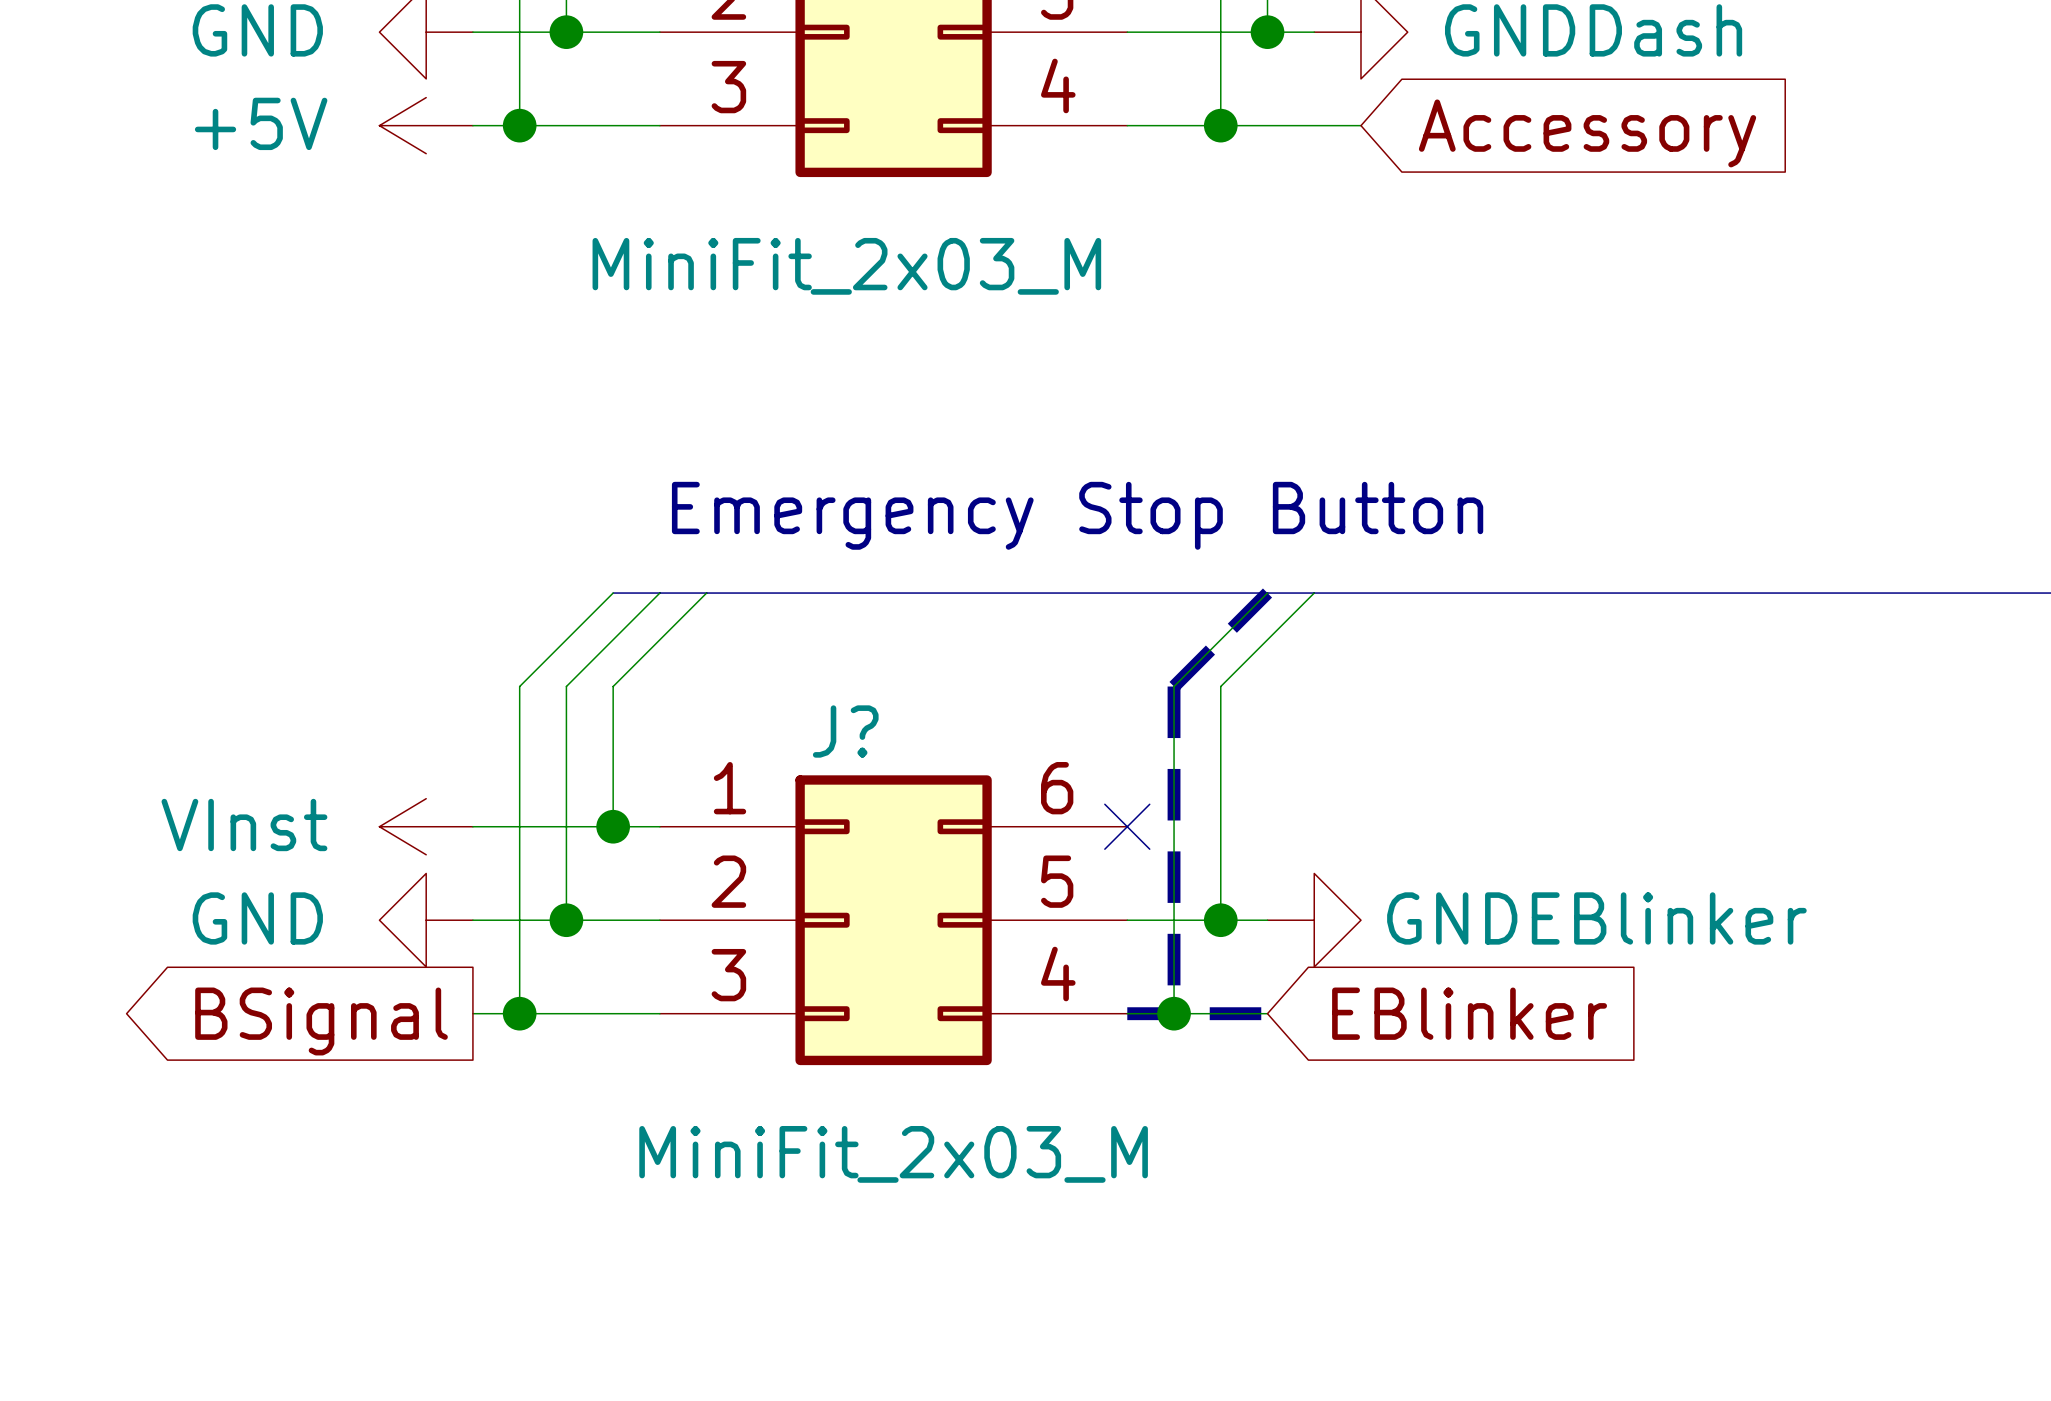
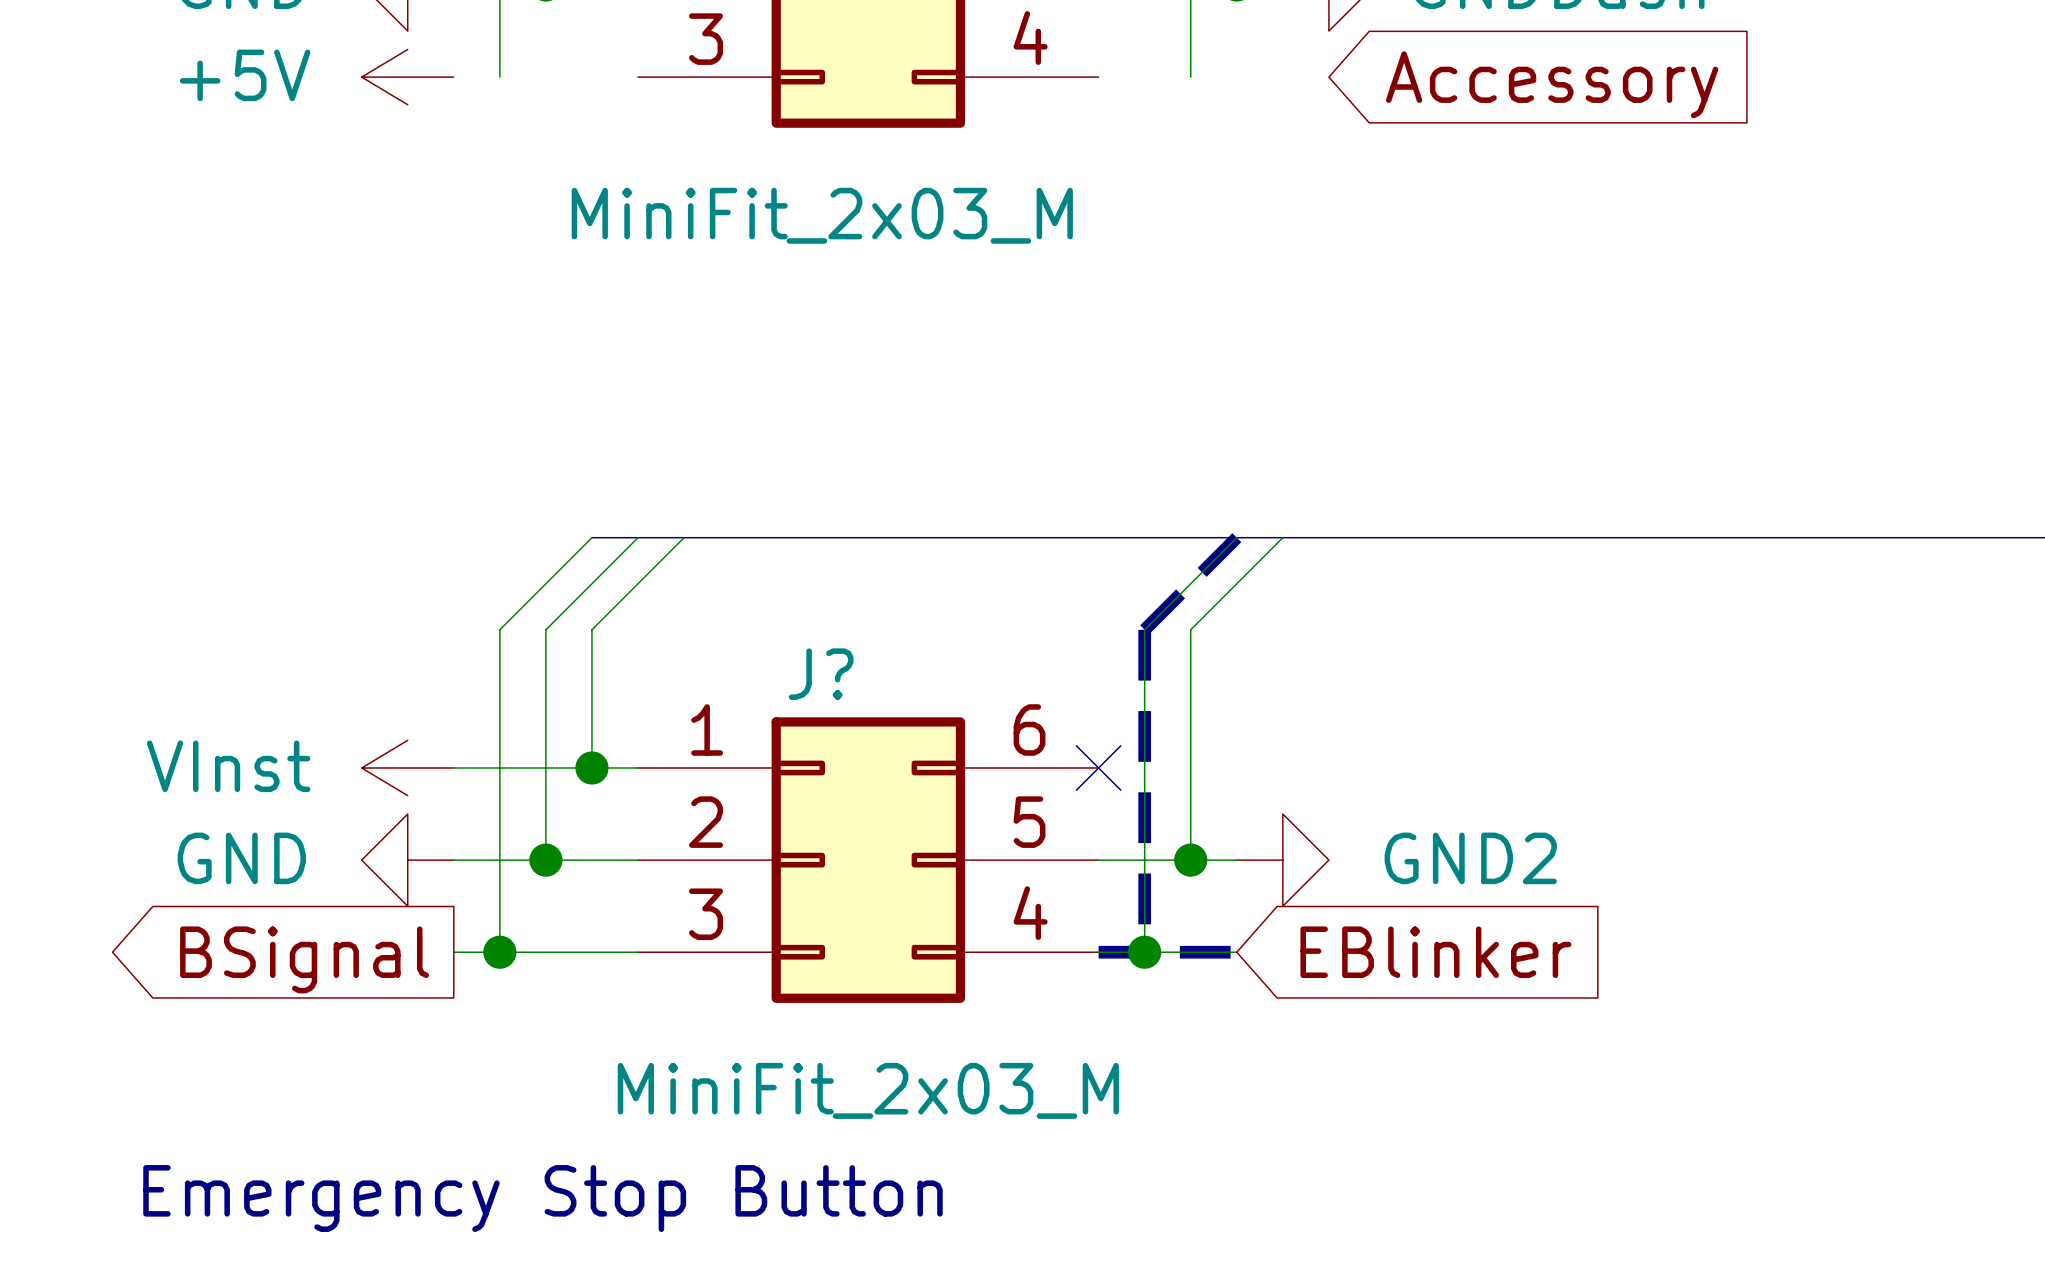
wire: (472, 125) (659, 125) -> none
junction: (519, 125) -> none
wire: (1127, 125) (1360, 125) -> none
junction: (1220, 125) -> none
text position: Emergency Stop Button (1077, 515) -> Emergency Stop Button (542, 1198)
power symbol: GNDEBlinker (1314, 920) -> GND2 (1282, 860)

